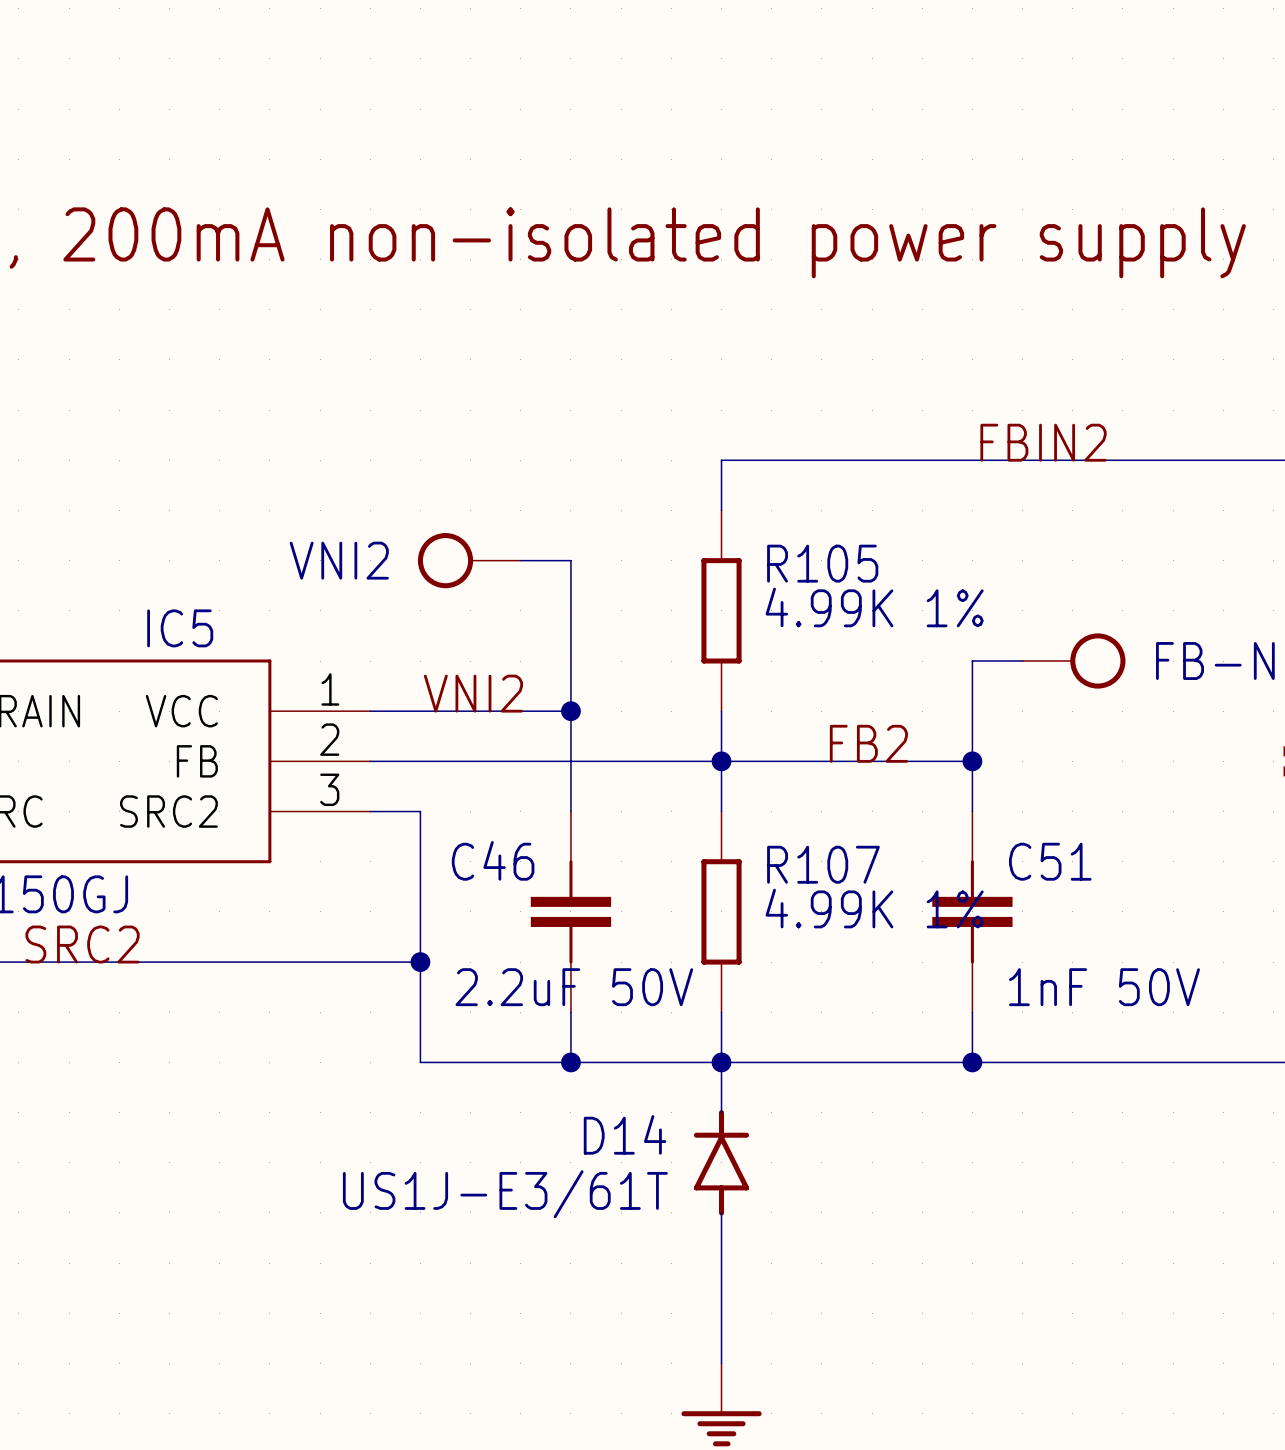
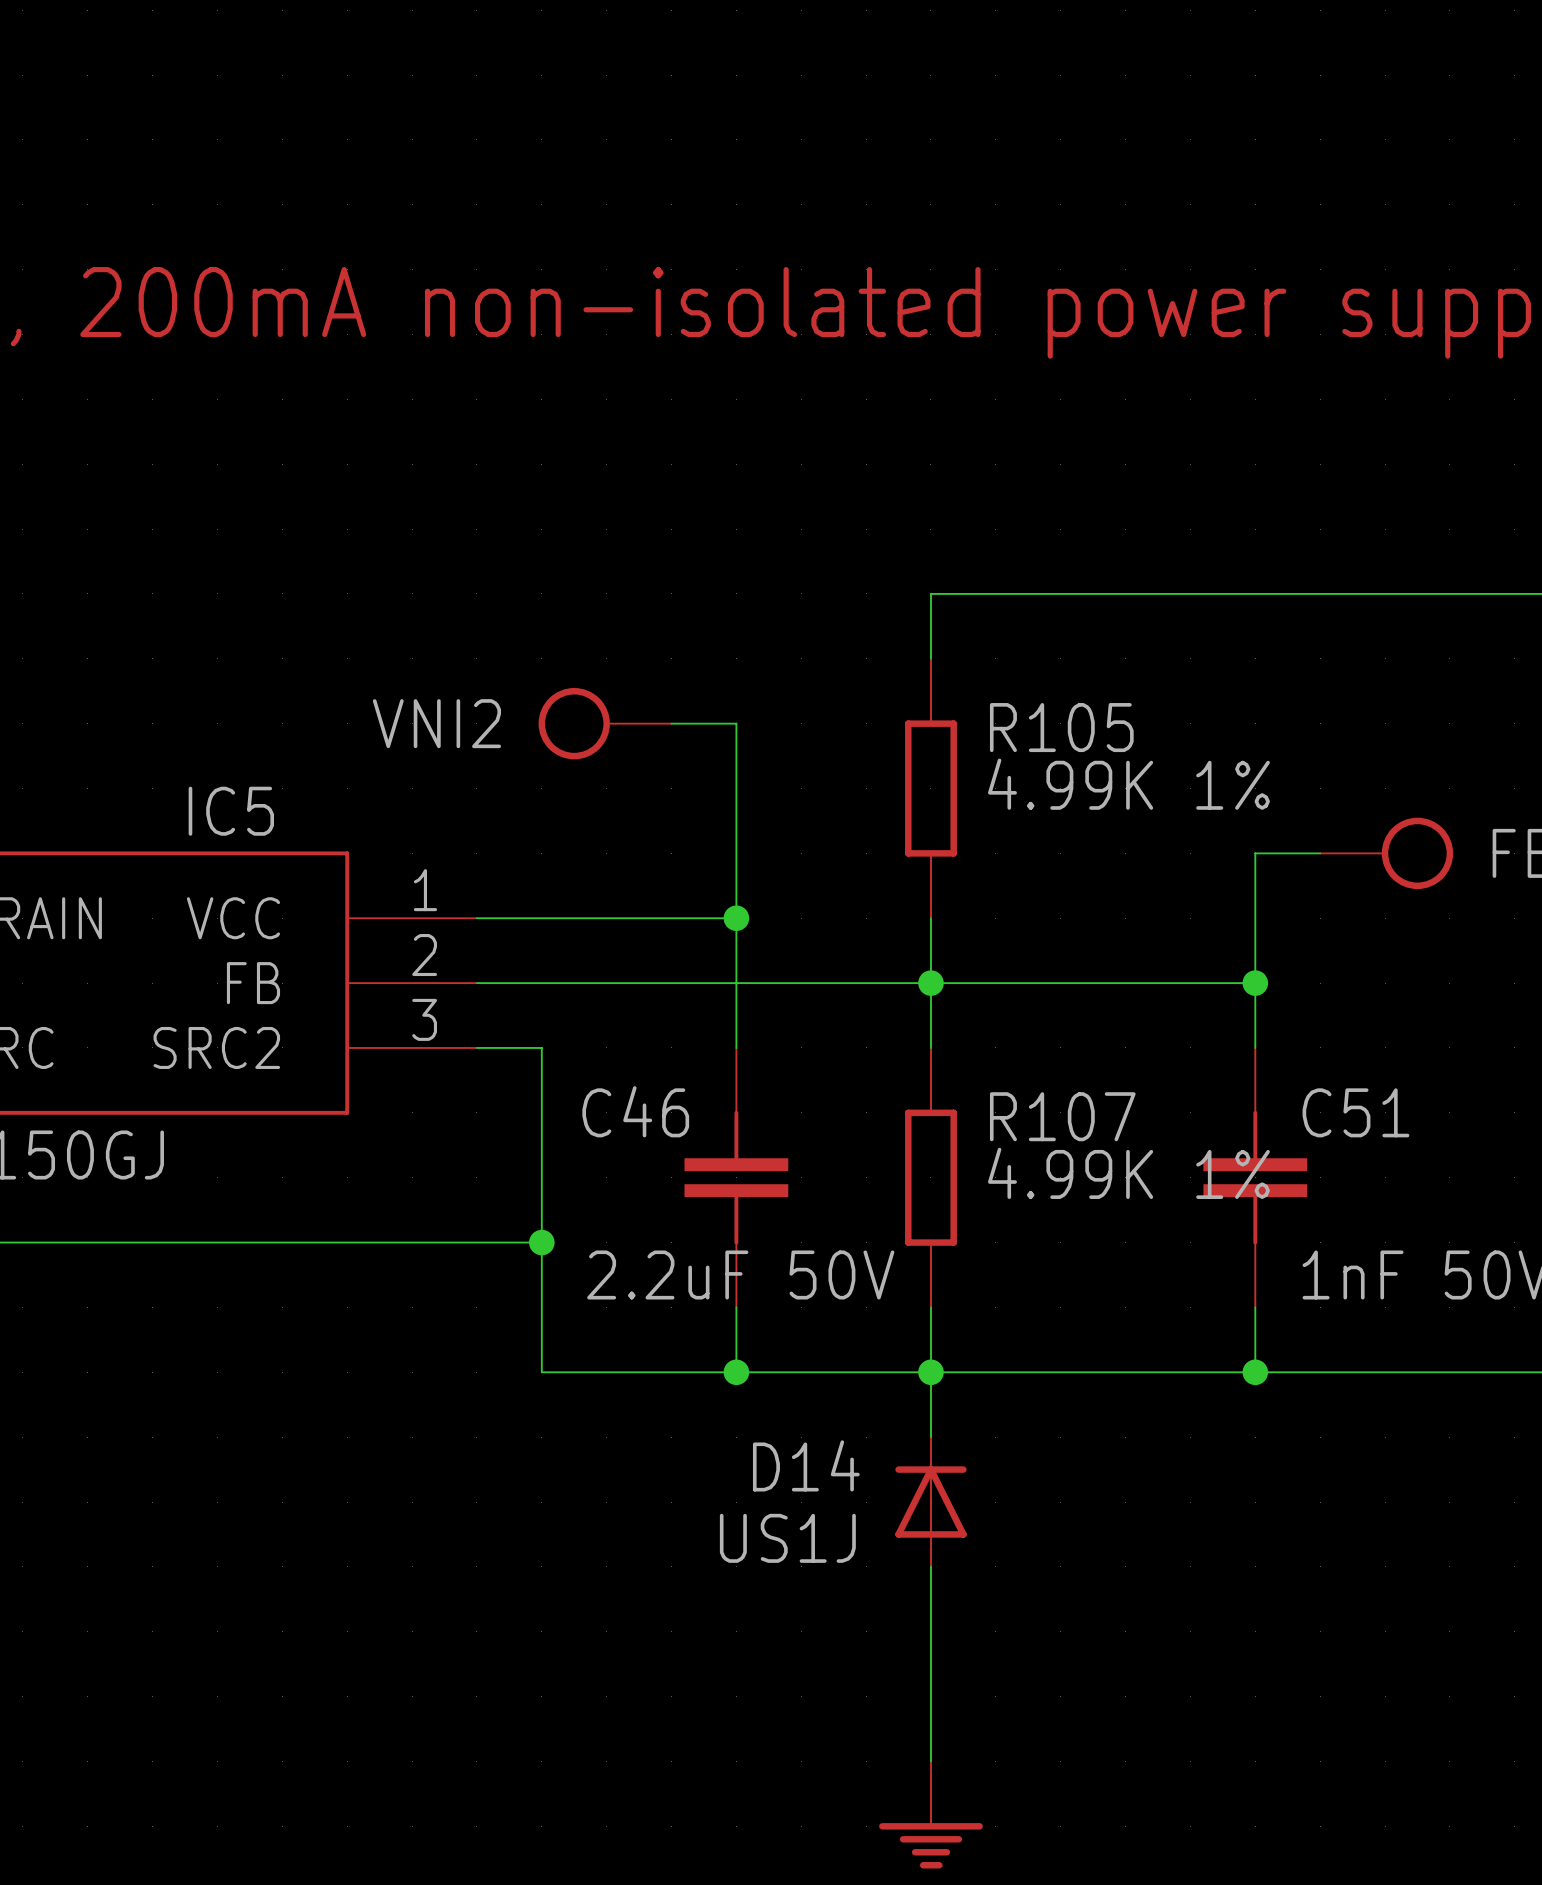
label: FBIN2 (1043, 442) -> none
label: VNI2 (473, 693) -> none
label: FB2 (868, 743) -> none
label: SRC2 (82, 944) -> none
D14 symbol: [693, 1110, 750, 1216] -> [895, 1437, 967, 1567]
D14 value: US1J-E3/61T (505, 1194) -> US1J (787, 1538)

